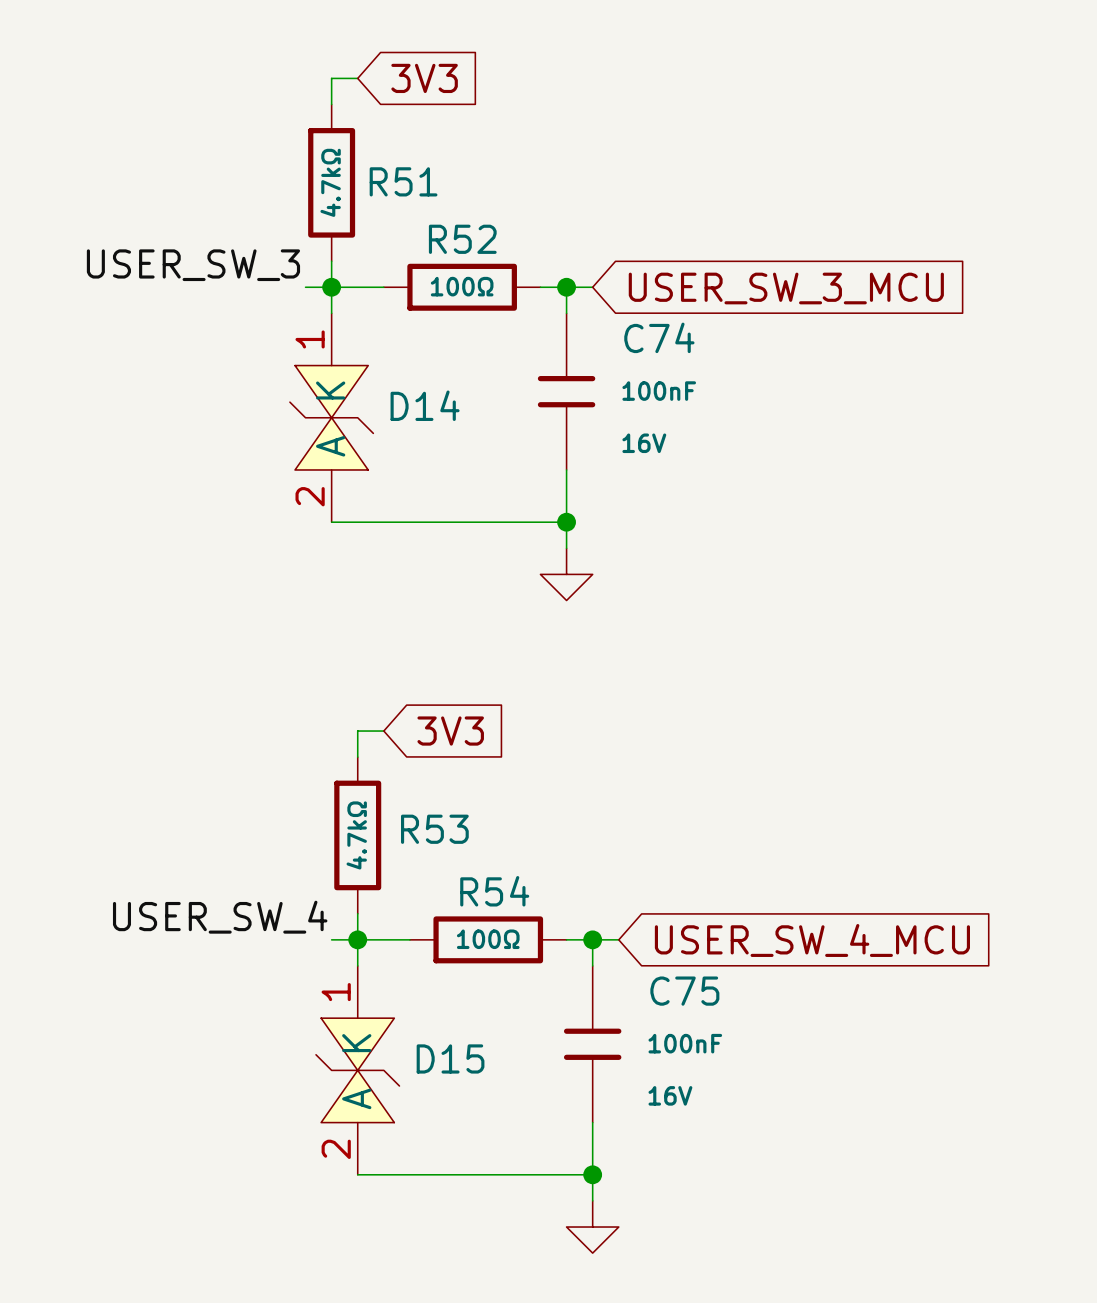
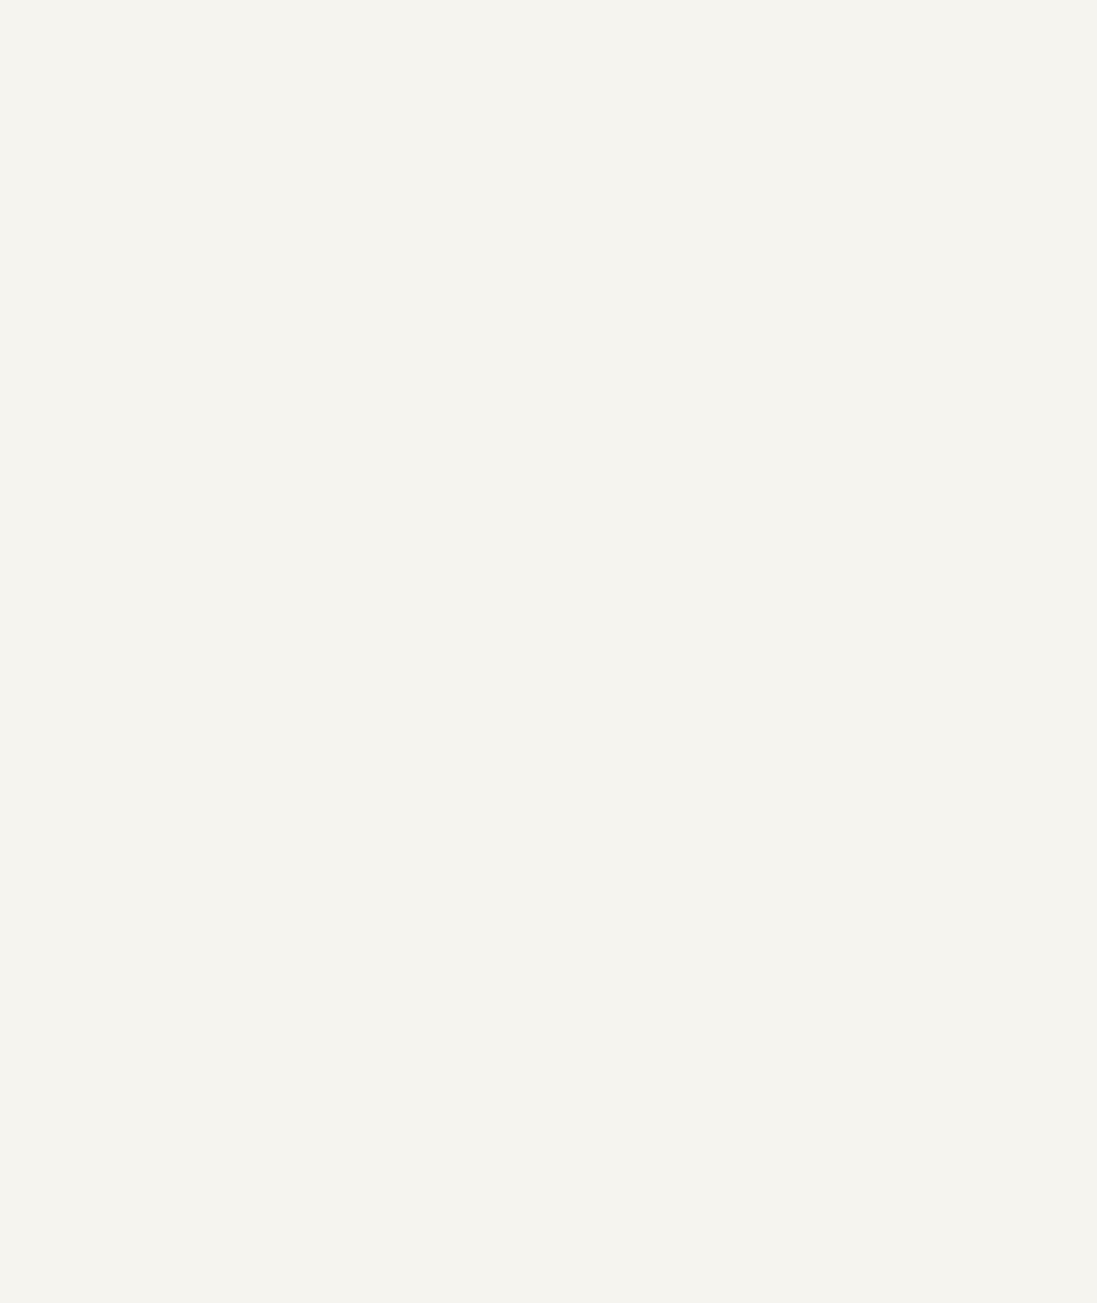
wire: (357, 78) (331, 78) (331, 104) -> none
global label: 3V3 (424, 78) -> none
R51: 4.7kΩ (331, 182) -> none
wire: (331, 261) (331, 313) -> none
label: USER_SW_3 (193, 265) -> none
wire: (305, 287) (383, 287) -> none
junction: (331, 287) -> none
R52: 100Ω (462, 287) -> none
wire: (540, 287) (592, 287) -> none
wire: (566, 287) (566, 313) -> none
junction: (566, 287) -> none
global label: USER_SW_3_MCU (786, 288) -> none
C74: 100nF (566, 391) -> none
D14: (331, 417) -> none
wire: (566, 469) (566, 548) -> none
wire: (331, 522) (566, 522) -> none
junction: (566, 522) -> none
power symbol: (566, 574) -> none
wire: (383, 731) (357, 731) (357, 757) -> none
global label: 3V3 (450, 731) -> none
R53: 4.7kΩ (357, 835) -> none
wire: (357, 913) (357, 965) -> none
label: USER_SW_4 (220, 917) -> none
wire: (331, 939) (409, 939) -> none
junction: (357, 939) -> none
R54: 100Ω (488, 939) -> none
wire: (566, 939) (618, 939) -> none
wire: (592, 939) (592, 965) -> none
junction: (592, 939) -> none
global label: USER_SW_4_MCU (812, 940) -> none
C75: 100nF (592, 1044) -> none
D15: (357, 1070) -> none
wire: (592, 1122) (592, 1200) -> none
wire: (357, 1174) (592, 1174) -> none
junction: (592, 1174) -> none
power symbol: (592, 1227) -> none

